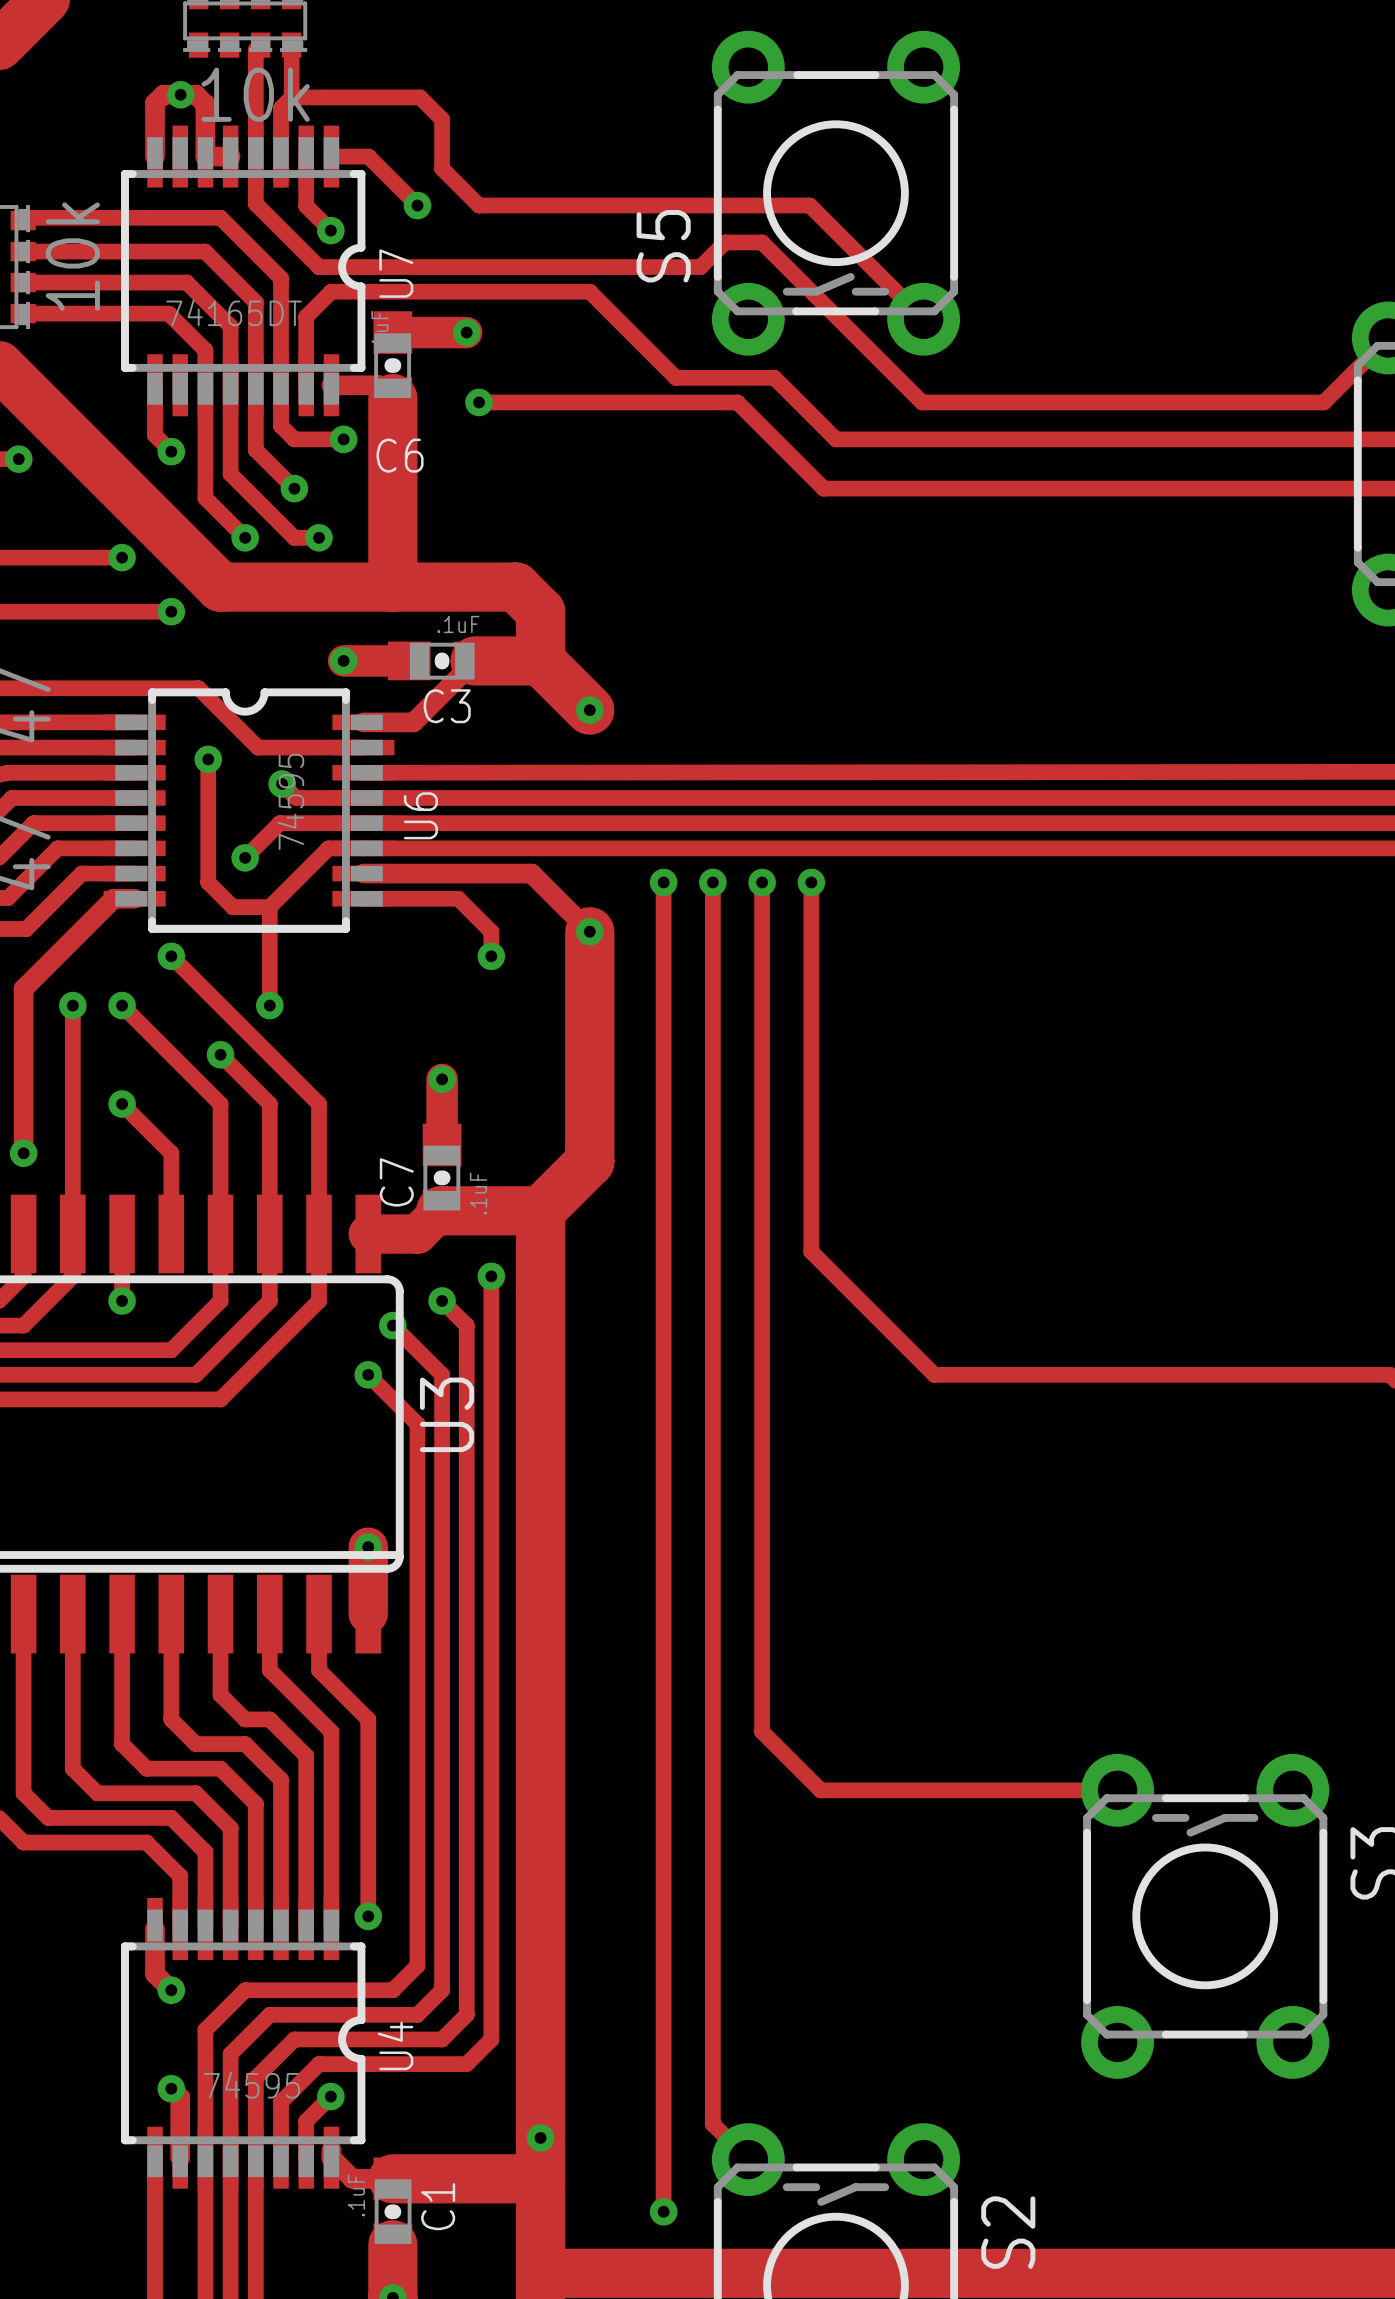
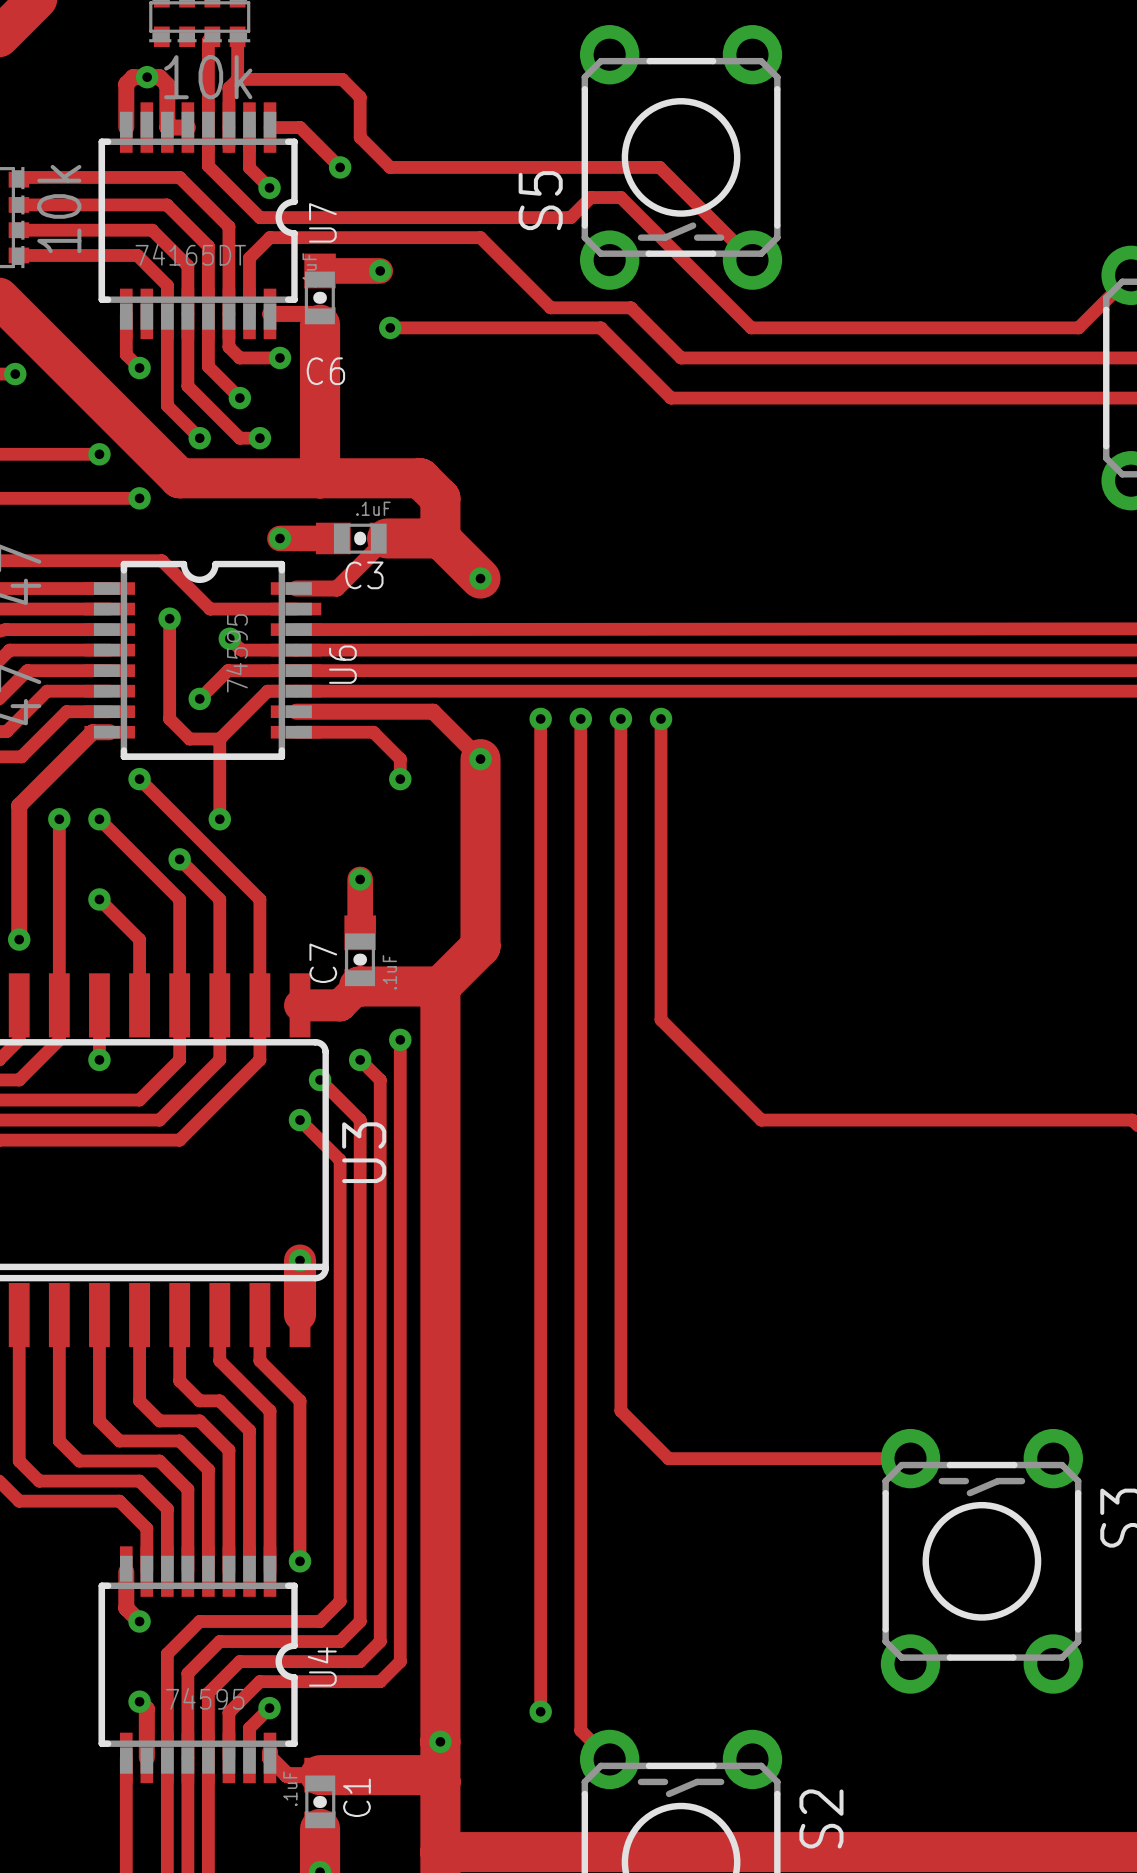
track: (663, 2101) (663, 2211) -> none
via position: (663, 2211) -> (540, 1711)

